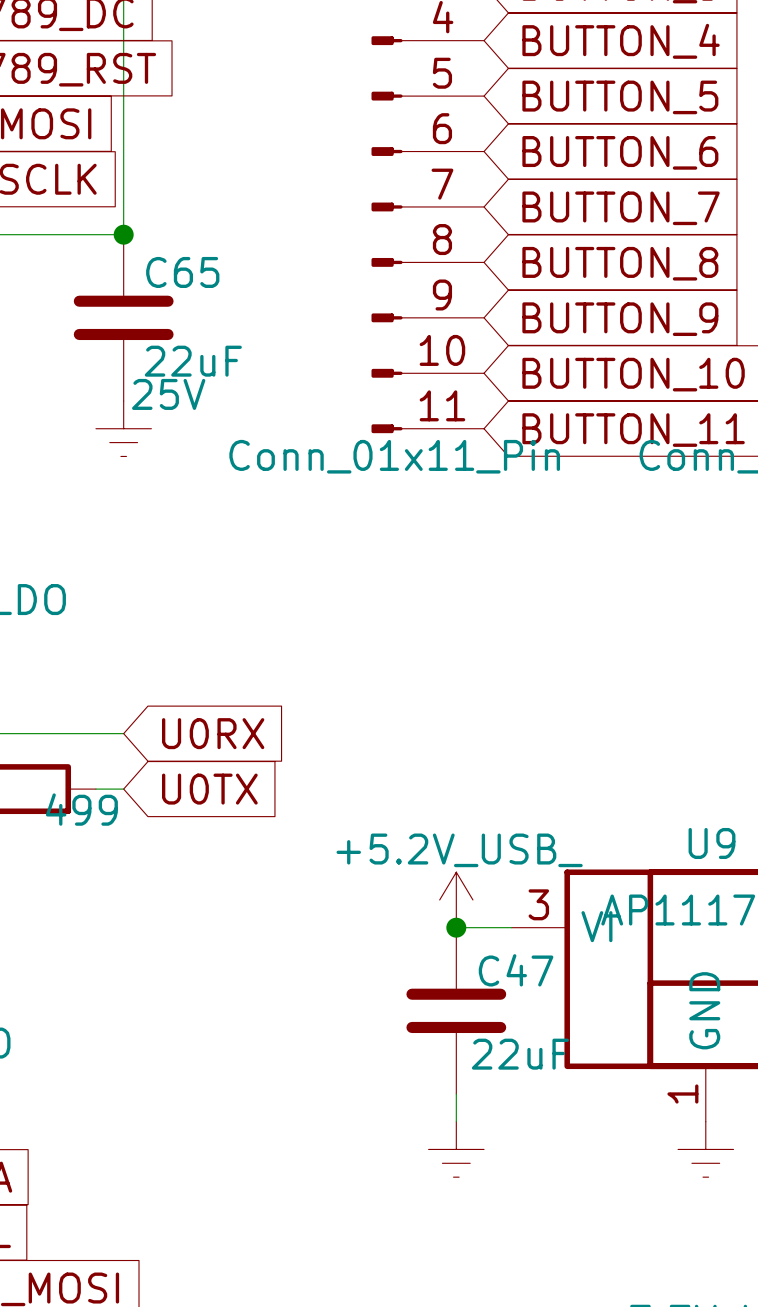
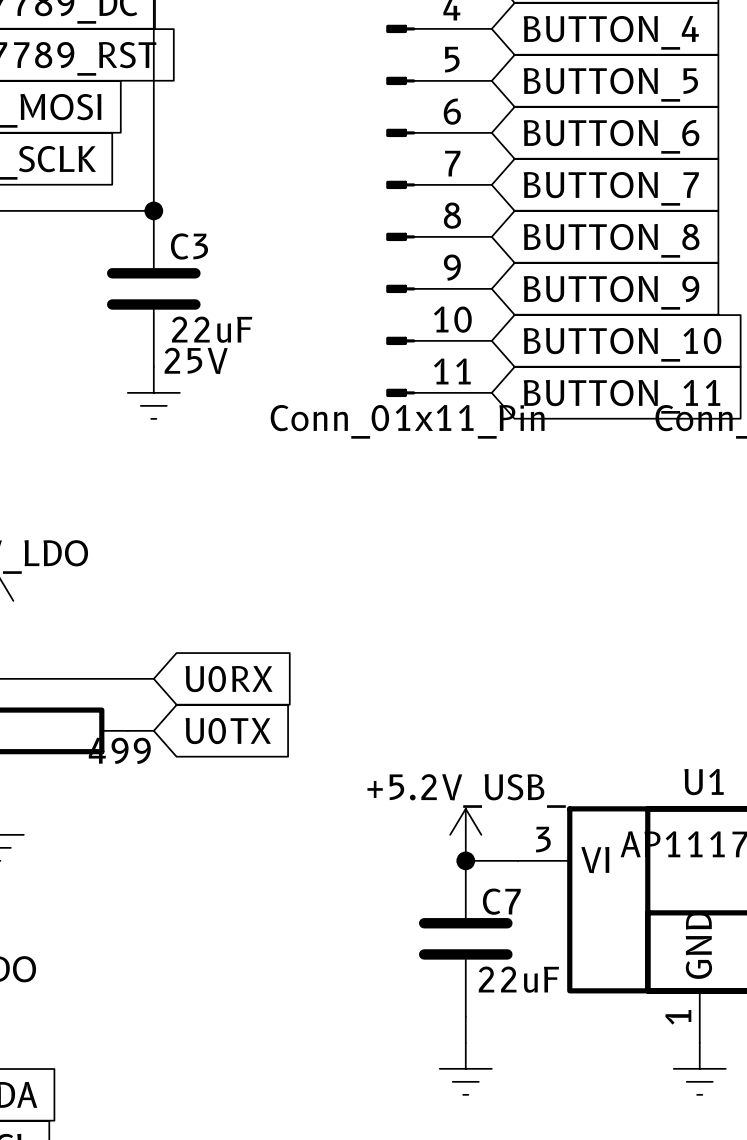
C65 name: C65 (182, 272) -> C3 (189, 246)
U9 name: U9 (711, 843) -> U1 (704, 782)
C47 name: C47 (516, 970) -> C7 (501, 901)

